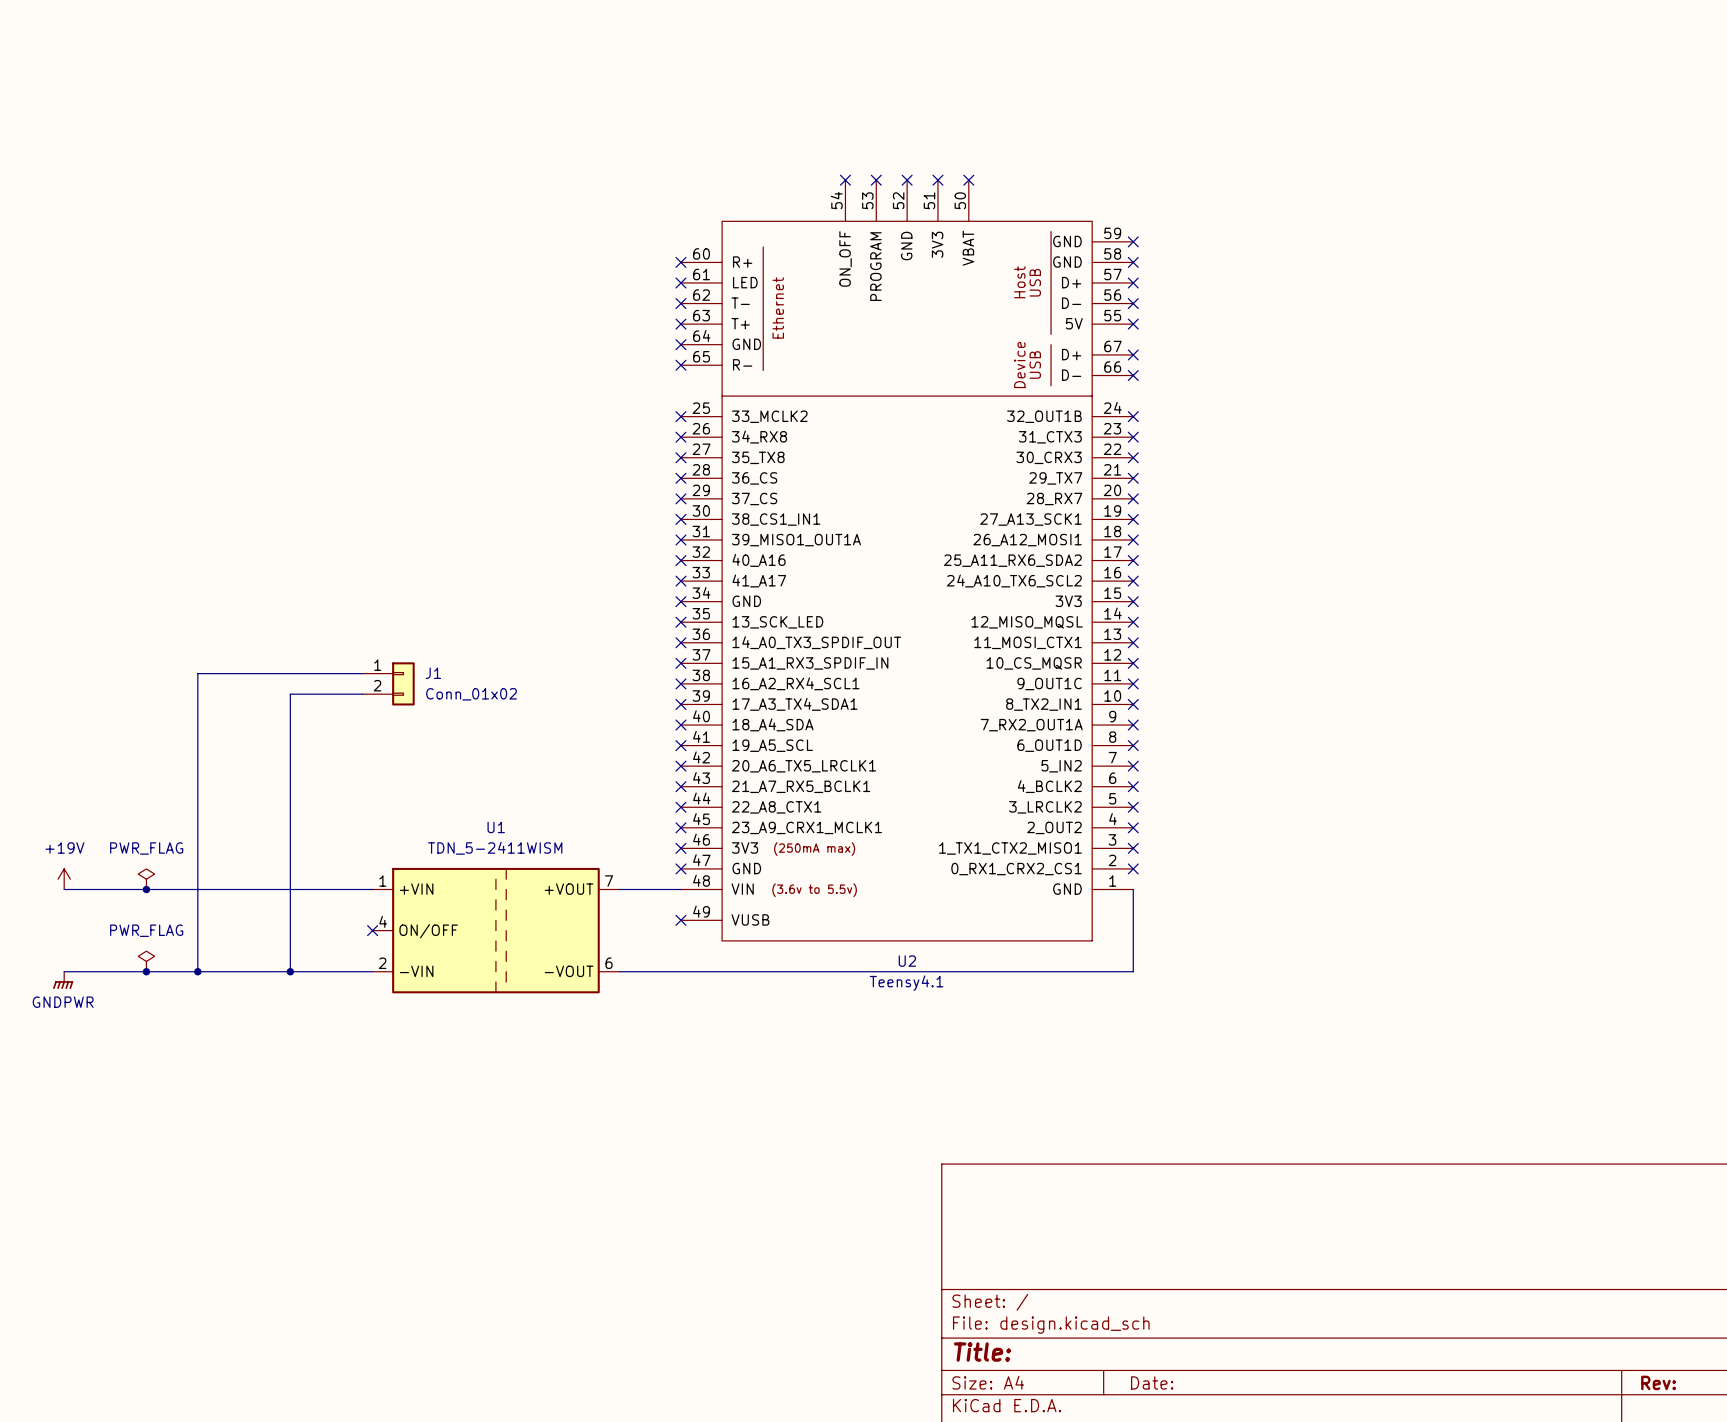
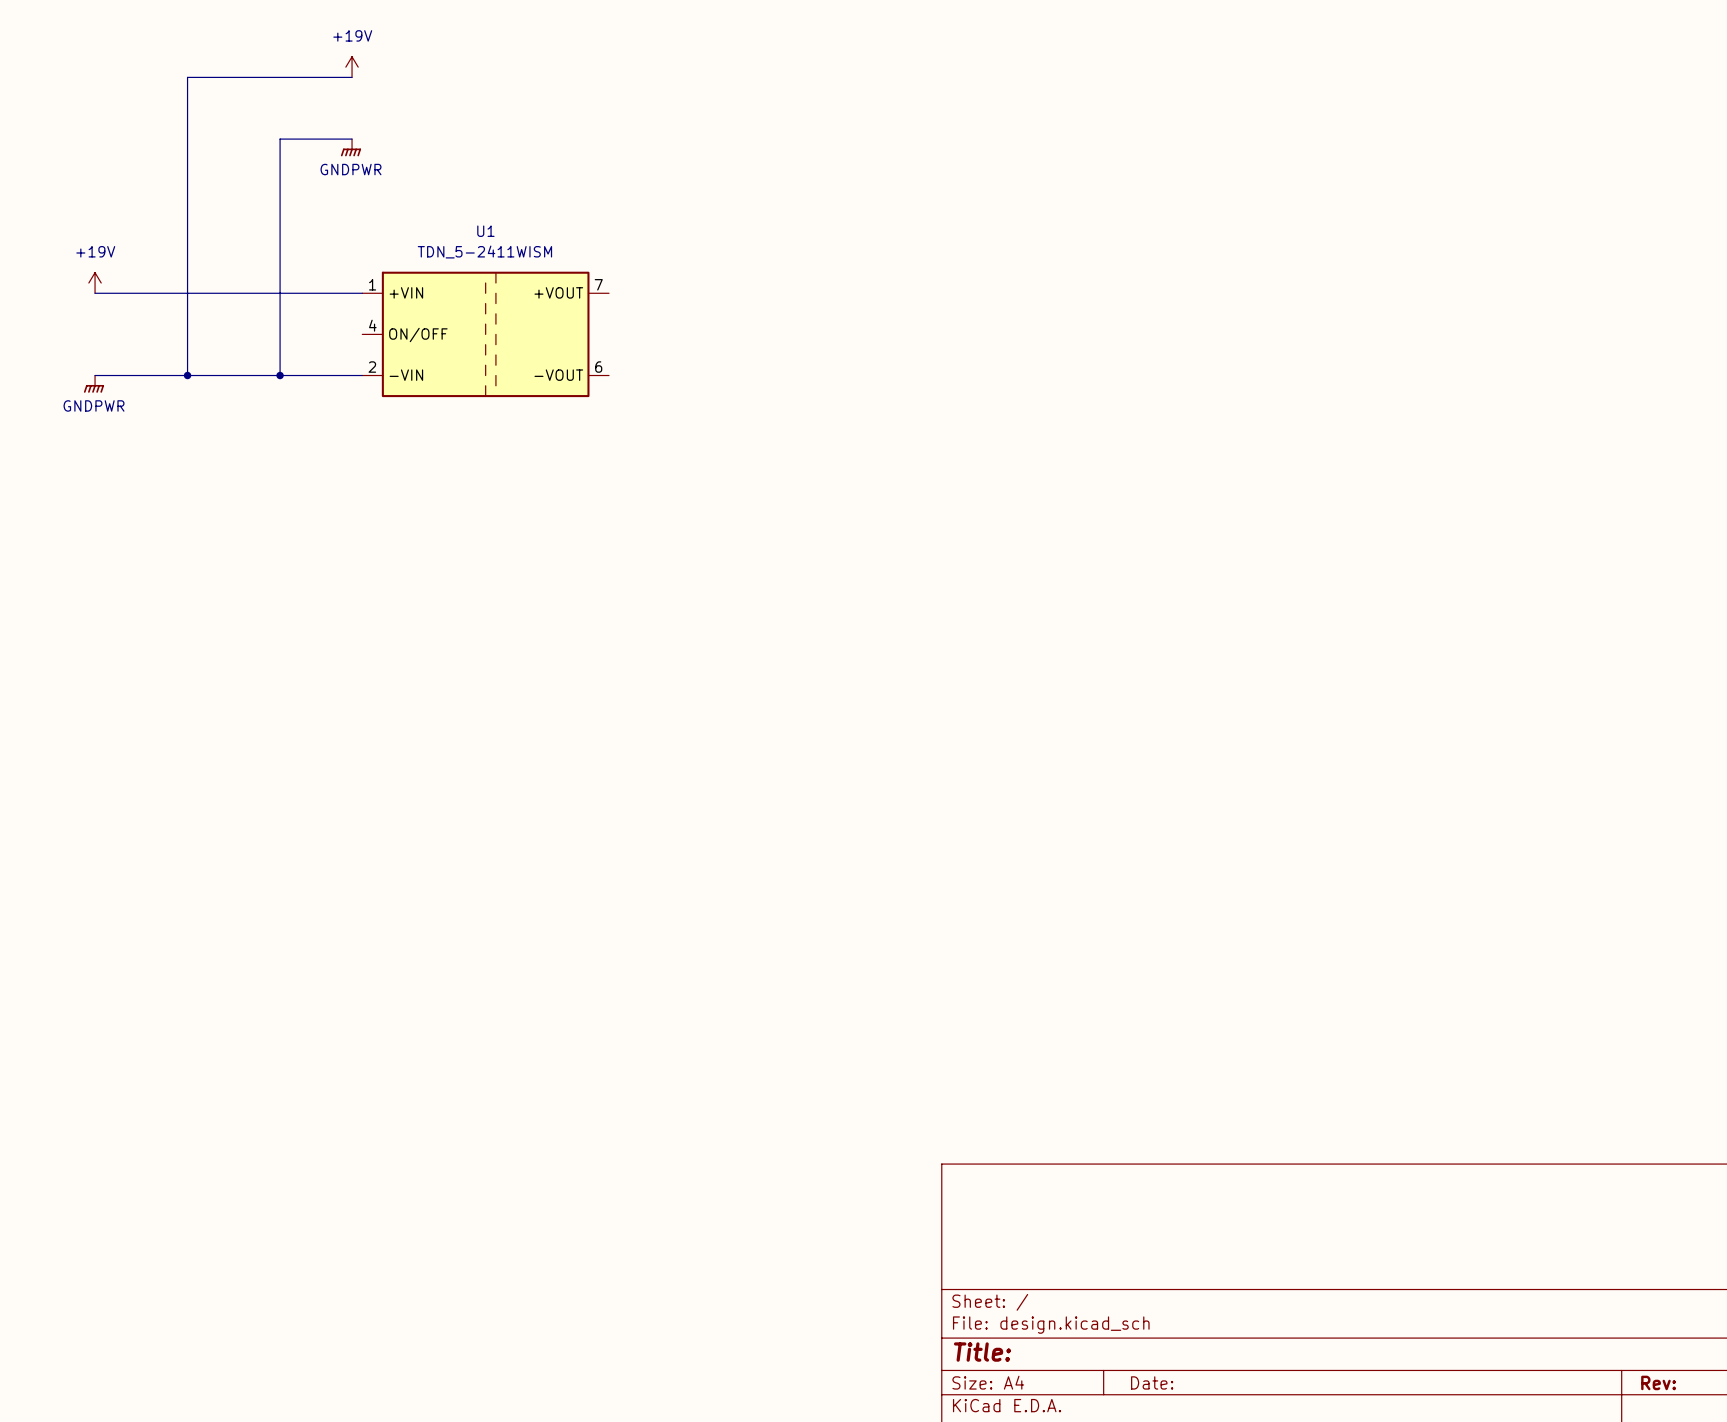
power symbol: none -> +19V (352, 67)
wire: none -> (352, 77) (187, 77) (187, 375)
wire: none -> (352, 139) (280, 139) (280, 375)
power symbol: none -> GNDPWR (351, 147)
no-connect mark: (845, 180) -> none
no-connect mark: (876, 180) -> none
no-connect mark: (907, 180) -> none
no-connect mark: (937, 180) -> none
no-connect mark: (968, 180) -> none
no-connect mark: (1133, 241) -> none
no-connect mark: (680, 262) -> none
no-connect mark: (1133, 262) -> none
power symbol: none -> +19V (95, 283)
no-connect mark: (680, 283) -> none
no-connect mark: (1133, 283) -> none
wire: none -> (95, 293) (362, 293)
no-connect mark: (680, 303) -> none
no-connect mark: (1133, 303) -> none
no-connect mark: (680, 324) -> none
no-connect mark: (1133, 324) -> none
no-connect mark: (680, 344) -> none
no-connect mark: (1133, 354) -> none
no-connect mark: (680, 365) -> none
wire: none -> (95, 375) (362, 375)
junction: none -> (187, 375)
junction: none -> (280, 375)
no-connect mark: (1133, 375) -> none
power symbol: none -> GNDPWR (94, 384)
no-connect mark: (680, 416) -> none
no-connect mark: (1133, 416) -> none
no-connect mark: (680, 437) -> none
no-connect mark: (1133, 437) -> none
no-connect mark: (680, 457) -> none
no-connect mark: (1133, 457) -> none
no-connect mark: (680, 478) -> none
no-connect mark: (1133, 478) -> none
no-connect mark: (680, 498) -> none
no-connect mark: (1133, 498) -> none
no-connect mark: (680, 519) -> none
no-connect mark: (1133, 519) -> none
no-connect mark: (680, 539) -> none
no-connect mark: (1133, 539) -> none
no-connect mark: (680, 560) -> none
U2: Teensy4.1 (907, 560) -> none
no-connect mark: (1133, 560) -> none
no-connect mark: (680, 581) -> none
no-connect mark: (1133, 581) -> none
no-connect mark: (680, 601) -> none
no-connect mark: (1133, 601) -> none
no-connect mark: (680, 622) -> none
no-connect mark: (1133, 622) -> none
no-connect mark: (680, 642) -> none
no-connect mark: (1133, 642) -> none
no-connect mark: (680, 663) -> none
no-connect mark: (1133, 663) -> none
wire: (362, 673) (197, 673) (197, 971) -> none
J1: Conn_01x02 (388, 683) -> none
no-connect mark: (680, 683) -> none
no-connect mark: (1133, 683) -> none
wire: (362, 694) (290, 694) (290, 971) -> none
no-connect mark: (680, 704) -> none
no-connect mark: (1133, 704) -> none
no-connect mark: (680, 725) -> none
no-connect mark: (1133, 725) -> none
no-connect mark: (680, 745) -> none
no-connect mark: (1133, 745) -> none
no-connect mark: (680, 766) -> none
no-connect mark: (1133, 766) -> none
no-connect mark: (680, 786) -> none
no-connect mark: (1133, 786) -> none
no-connect mark: (680, 807) -> none
no-connect mark: (1133, 807) -> none
no-connect mark: (680, 827) -> none
no-connect mark: (1133, 827) -> none
no-connect mark: (680, 848) -> none
no-connect mark: (1133, 848) -> none
no-connect mark: (680, 868) -> none
no-connect mark: (1133, 868) -> none
power symbol: +19V (64, 879) -> none
power symbol: PWR_FLAG (146, 879) -> none
wire: (64, 889) (372, 889) -> none
junction: (146, 889) -> none
wire: (619, 889) (680, 889) -> none
wire: (1133, 889) (1133, 971) (619, 971) -> none
no-connect mark: (680, 920) -> none
no-connect mark: (372, 930) -> none
U1 position: (495, 930) -> (485, 334)
power symbol: PWR_FLAG (146, 961) -> none
wire: (64, 971) (372, 971) -> none
junction: (146, 971) -> none
junction: (197, 971) -> none
junction: (290, 971) -> none
power symbol: GNDPWR (63, 980) -> none

